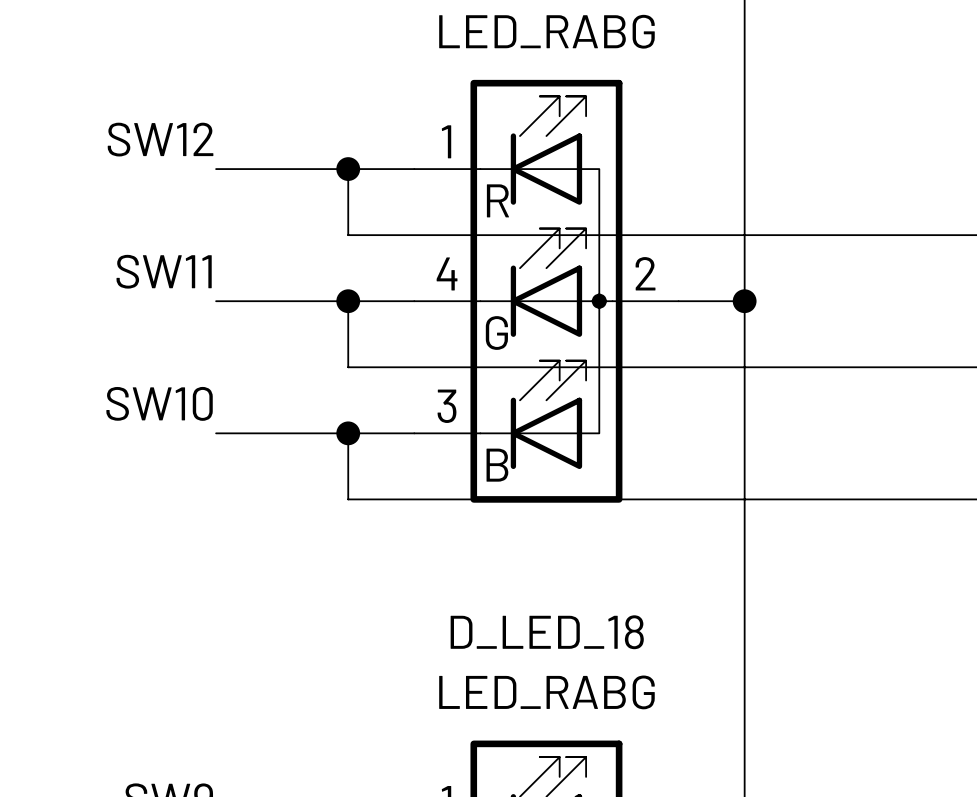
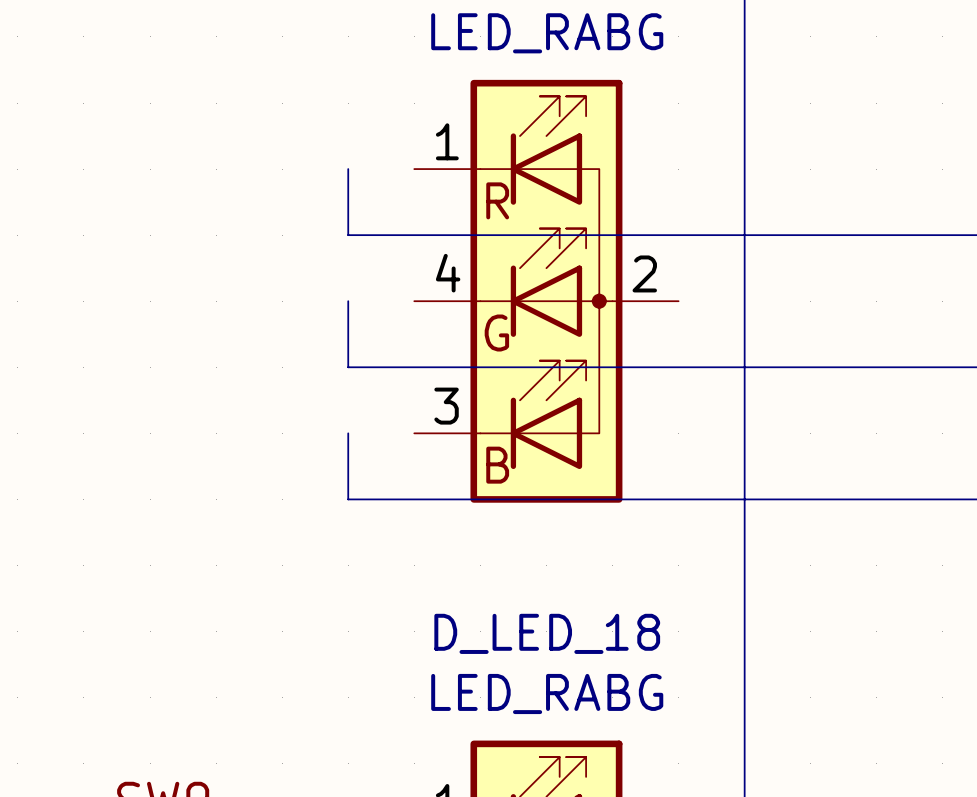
label: SW12 (160, 139) -> none
wire: (216, 169) (414, 169) -> none
junction: (348, 169) -> none
label: SW11 (164, 271) -> none
wire: (216, 301) (414, 301) -> none
junction: (348, 301) -> none
wire: (678, 301) (744, 301) -> none
junction: (744, 301) -> none
label: SW10 (159, 403) -> none
wire: (216, 433) (414, 433) -> none
junction: (348, 433) -> none

